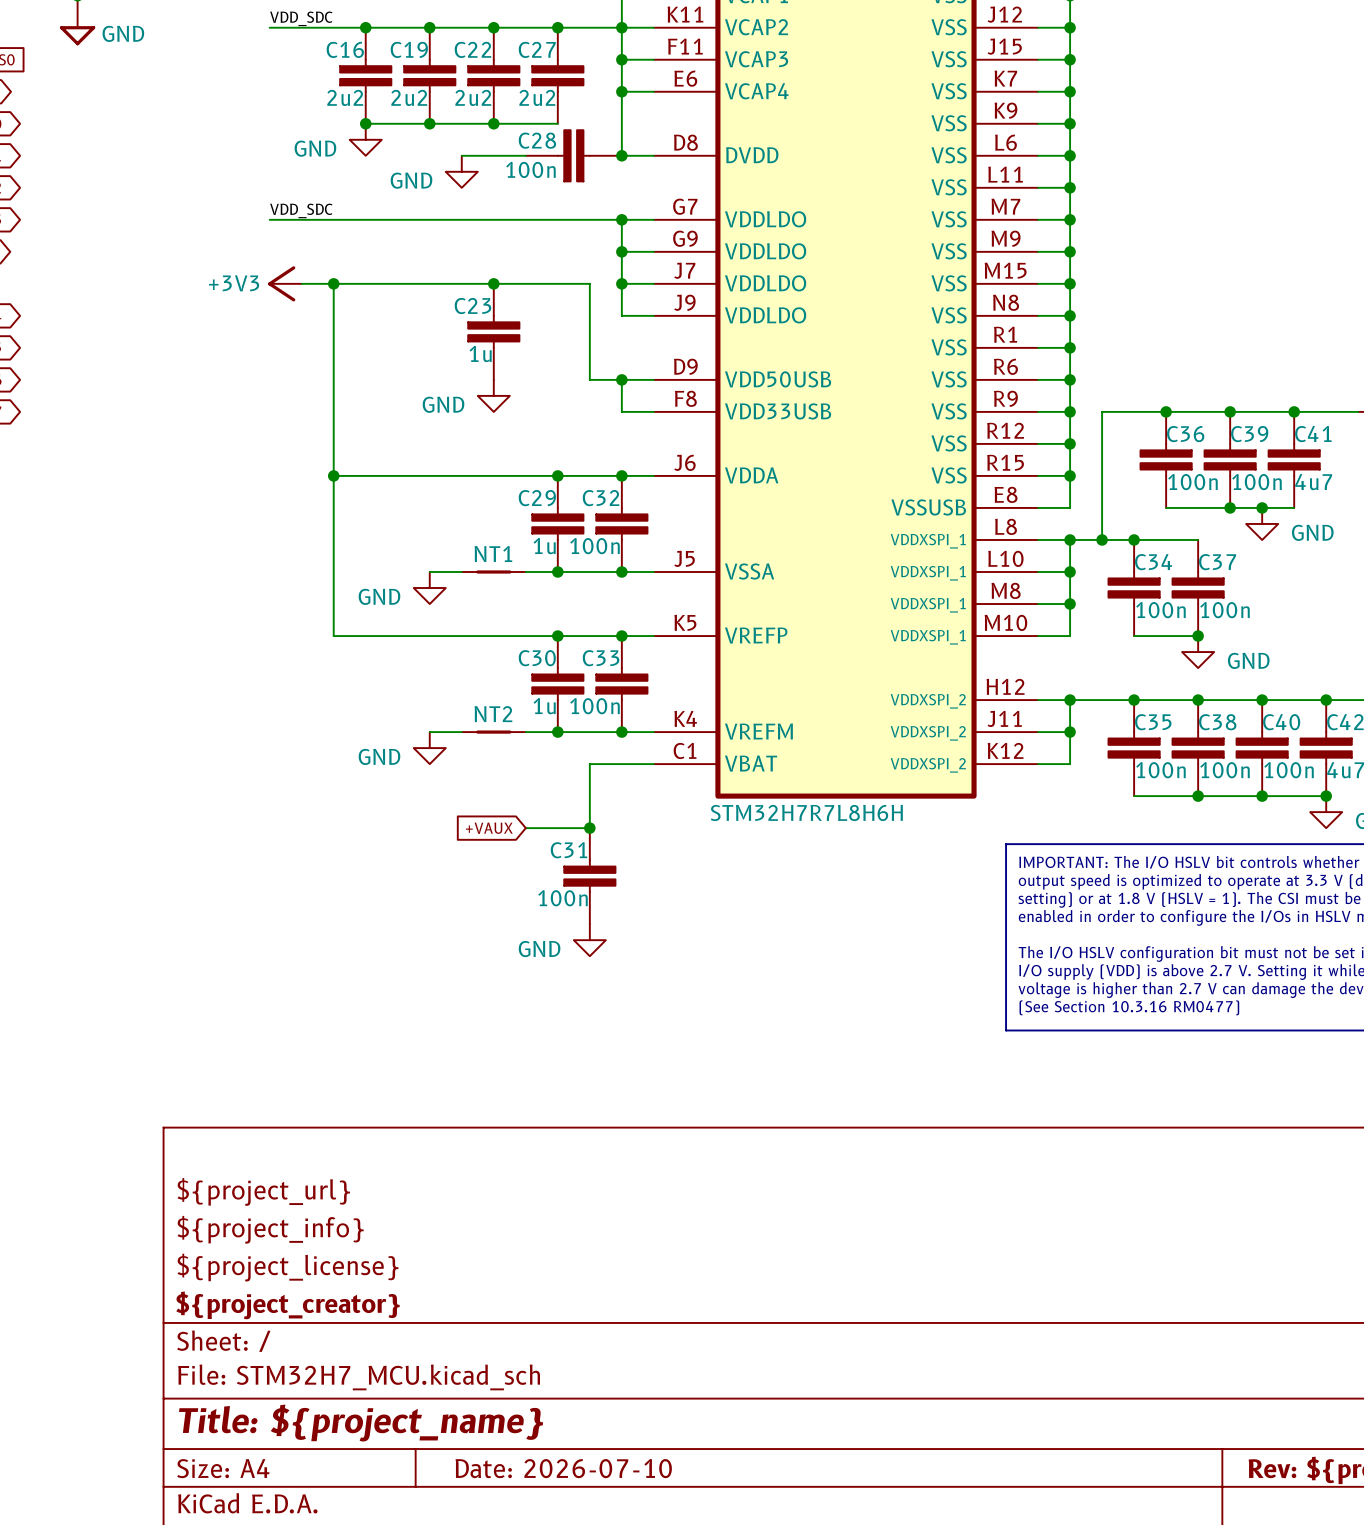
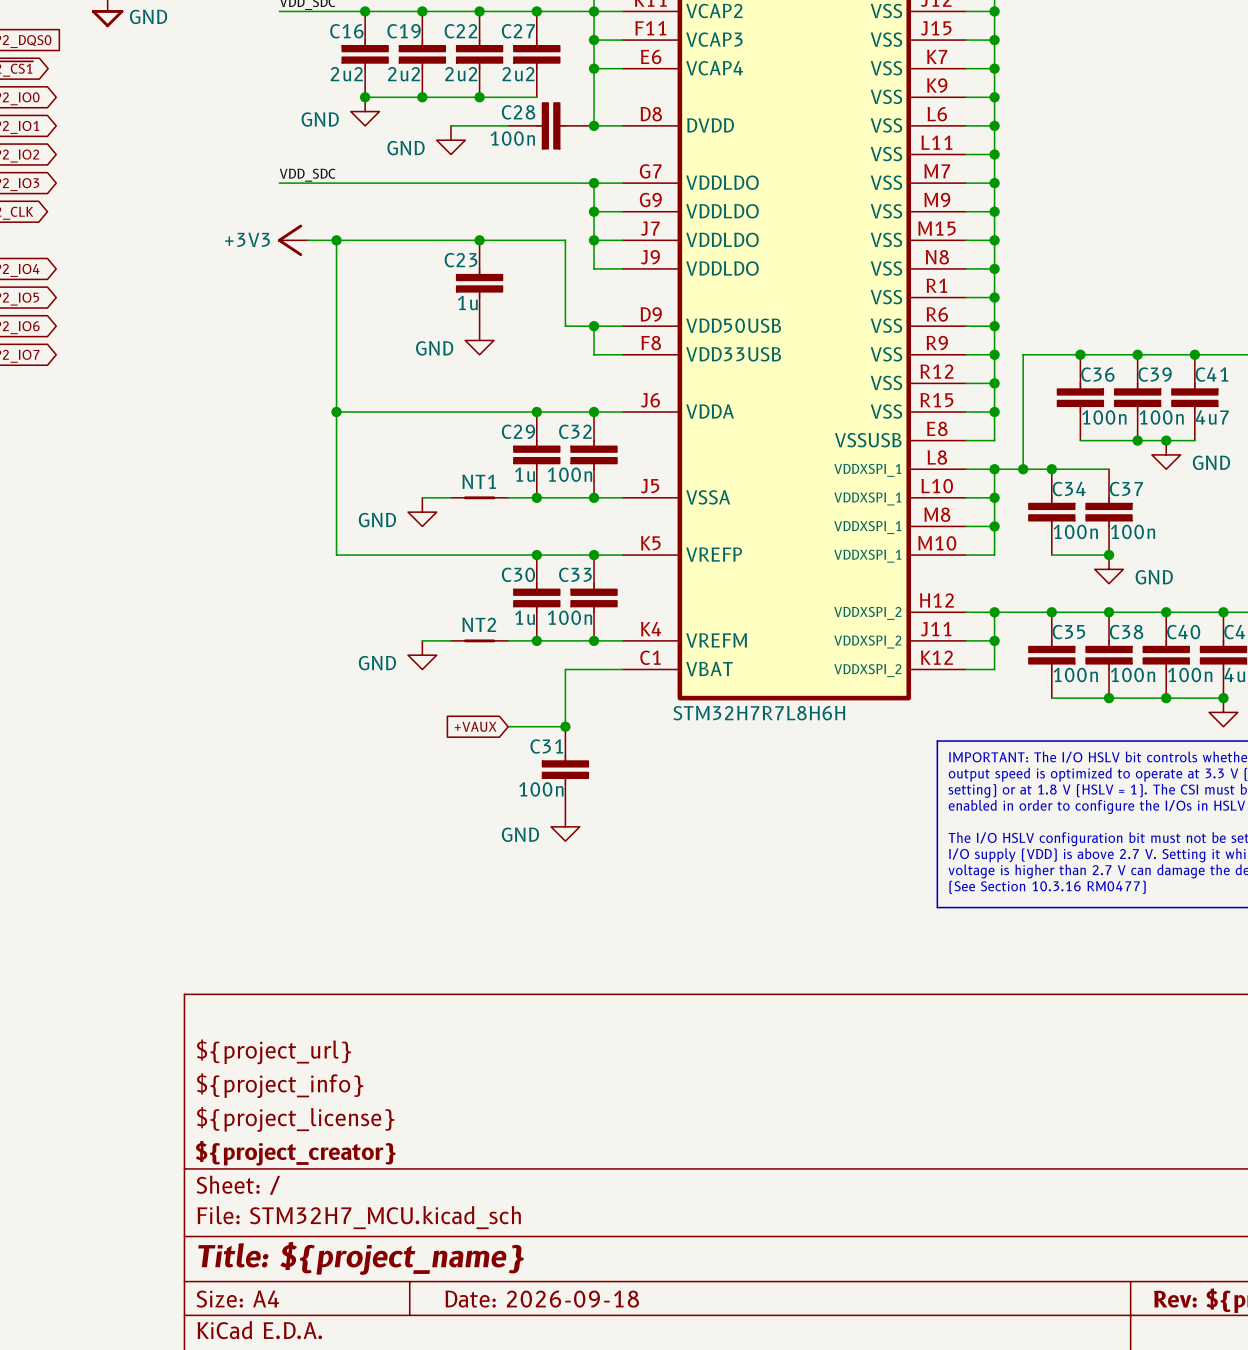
title block: Date: 2026-07-10 (563, 1468) -> Date: 2026-09-18 (542, 1299)

